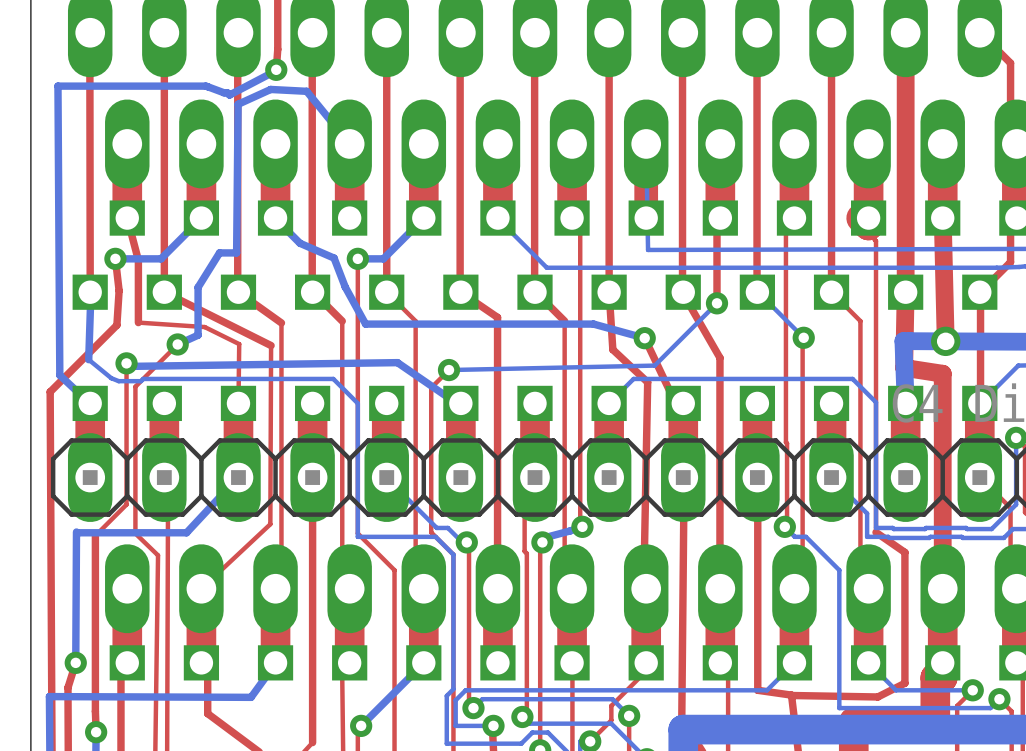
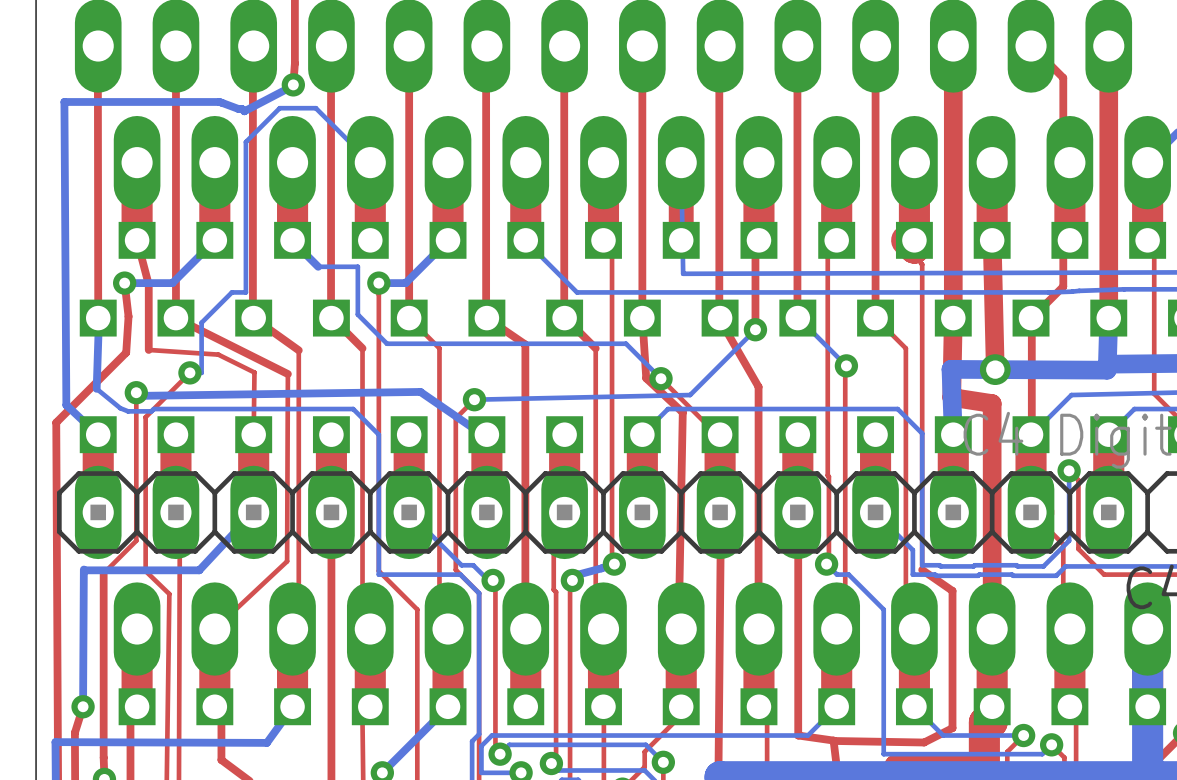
bottom track: (349, 143) (306, 91) (270, 89) (238, 104) (236, 252) (219, 252) (198, 287) (198, 335) (177, 344) -> (370, 162) (315, 108) (279, 108) (245, 142) (245, 292) (231, 292) (201, 322) (201, 372) (189, 372)
bottom track: (300, 243) (334, 258) (345, 287) (365, 324) (593, 324) (644, 338) -> (318, 266) (357, 266) (357, 314) (387, 343) (626, 343) (661, 378)
top track: (644, 338) (671, 394) -> (661, 378) (707, 425)
via position: (644, 338) -> (661, 378)

